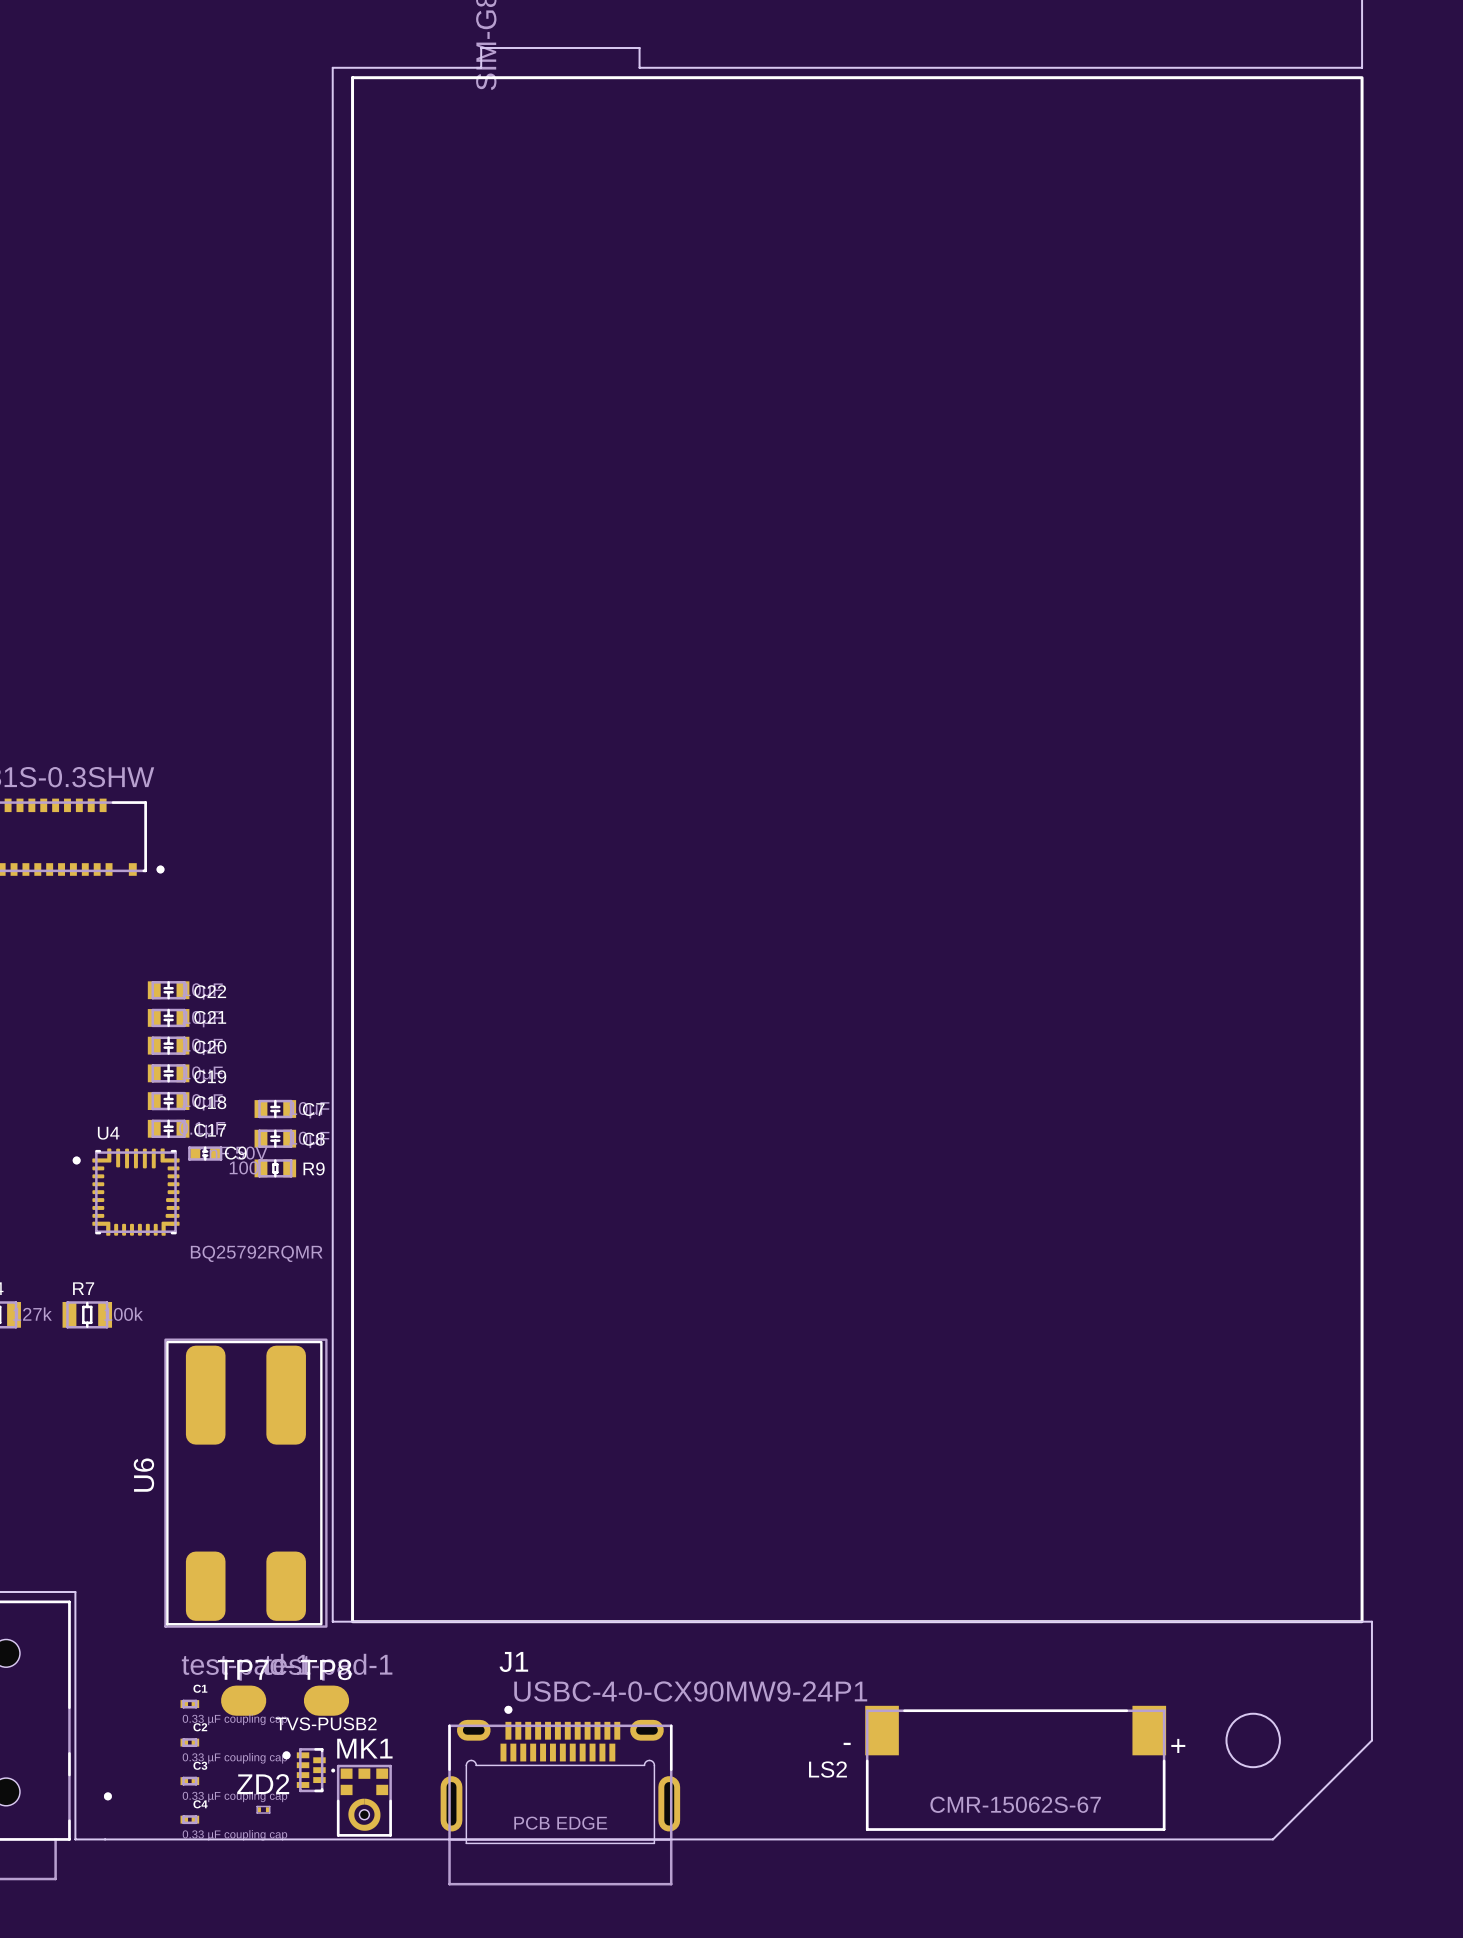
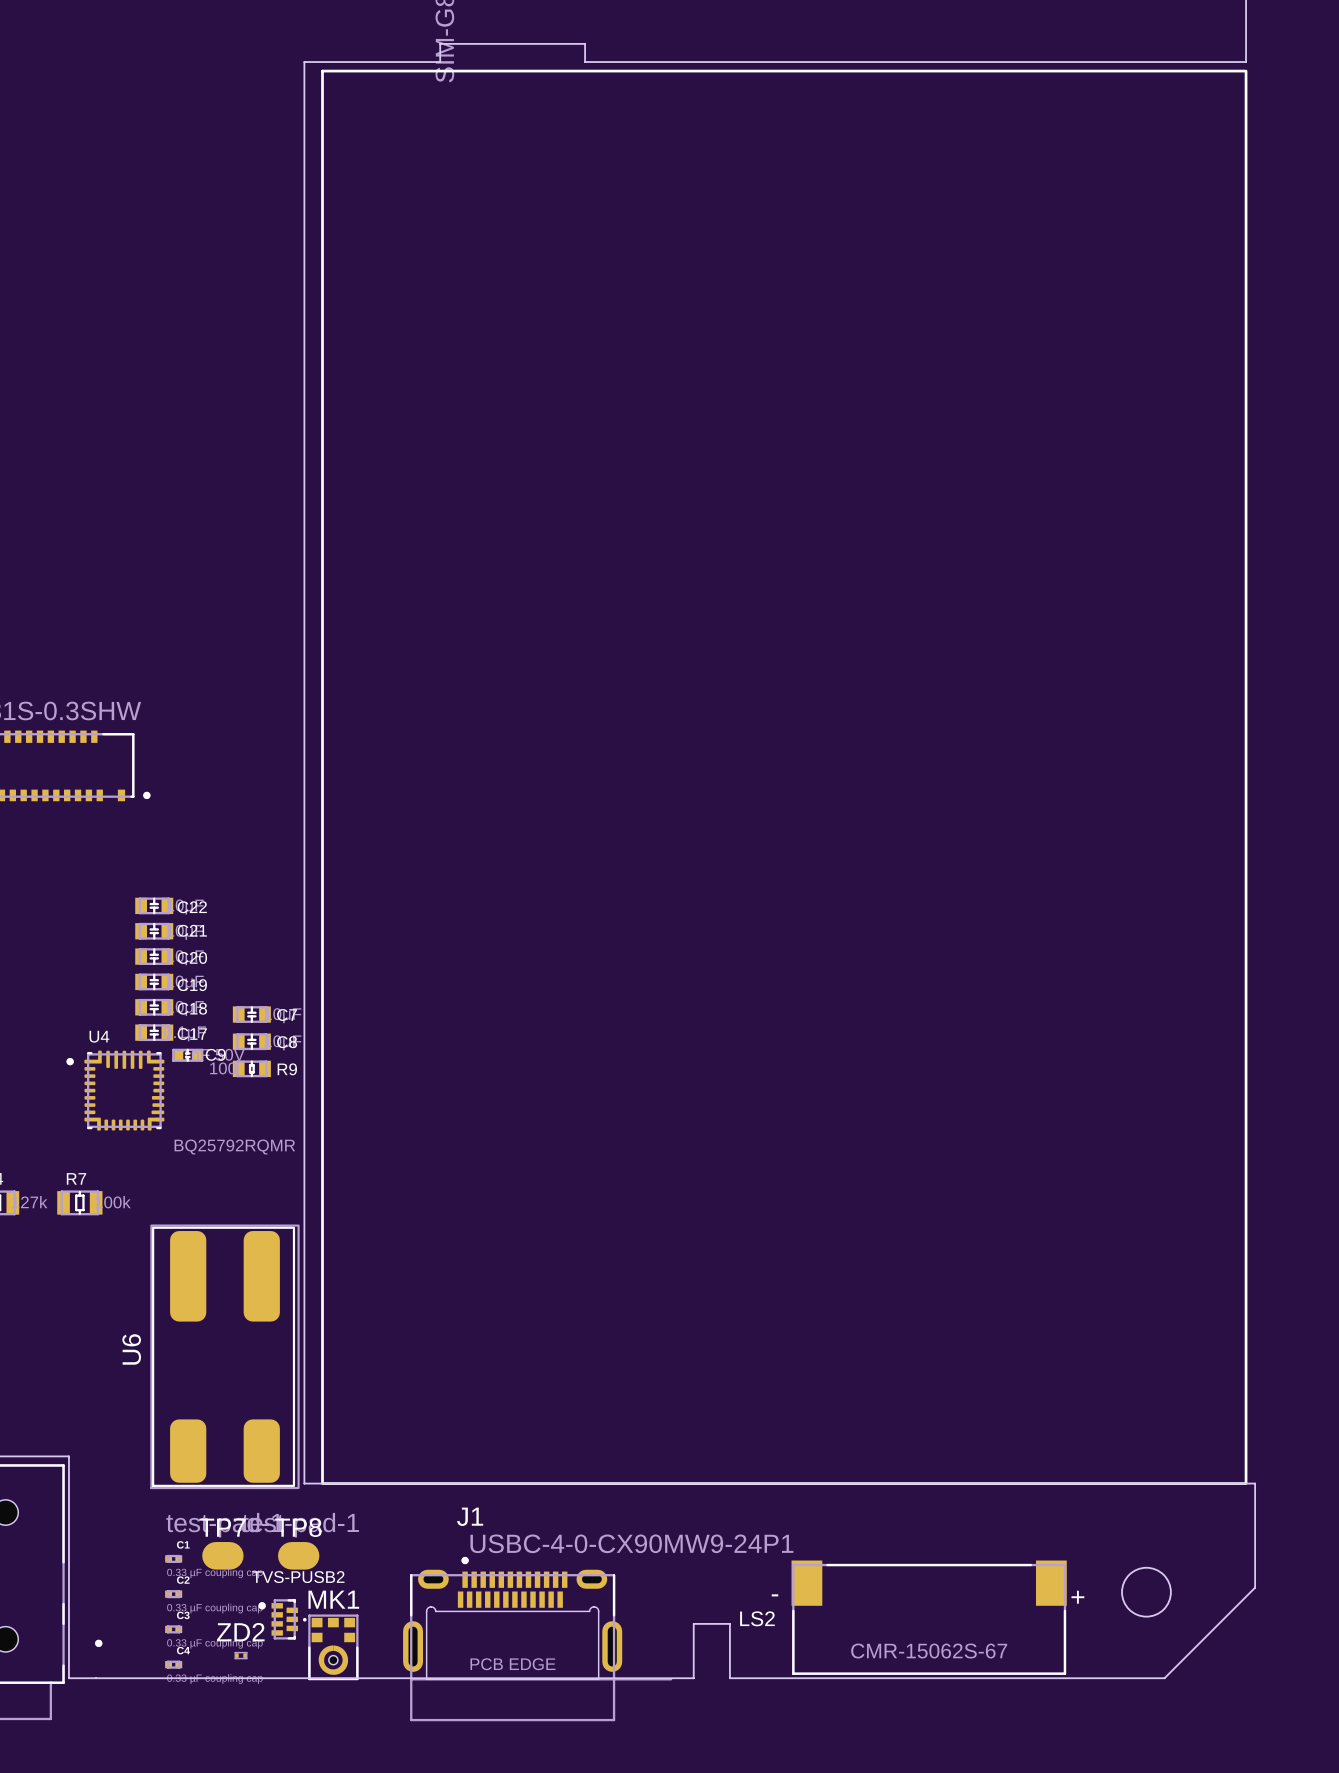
J1 footprint: [440, 1705, 681, 1886] -> [403, 1556, 673, 1722]
board edge: (1371, 1735) (1371, 1740) (1272, 1839) (75, 1839) (75, 1834) -> (1255, 1587) (1164, 1678) (729, 1678) (729, 1623) (693, 1623) (693, 1678) (68, 1678)

